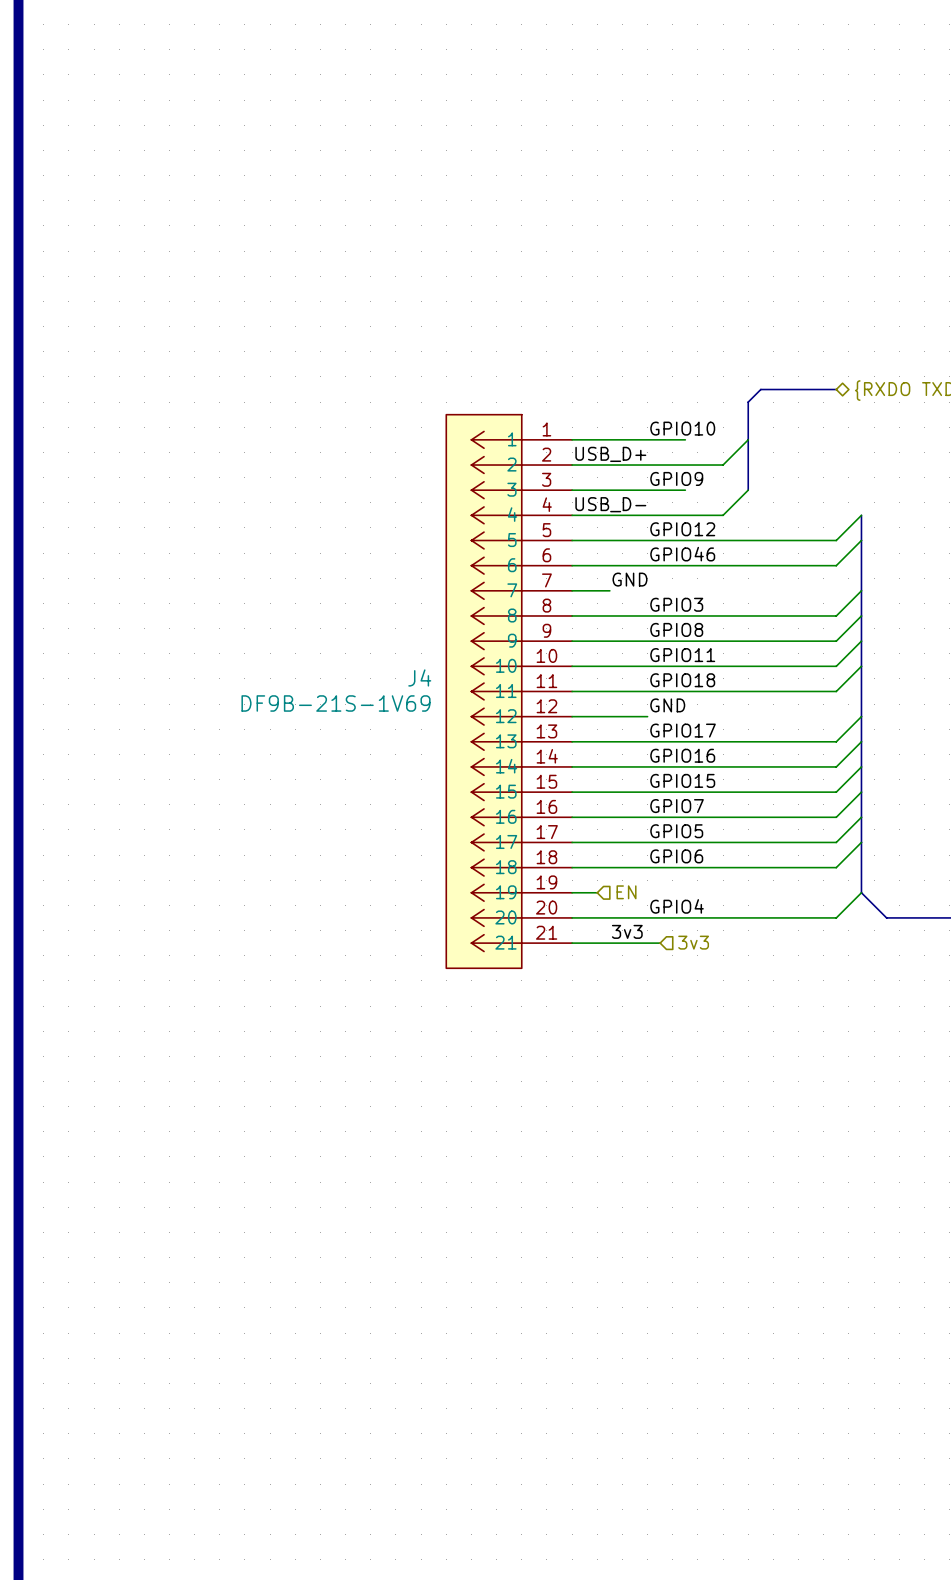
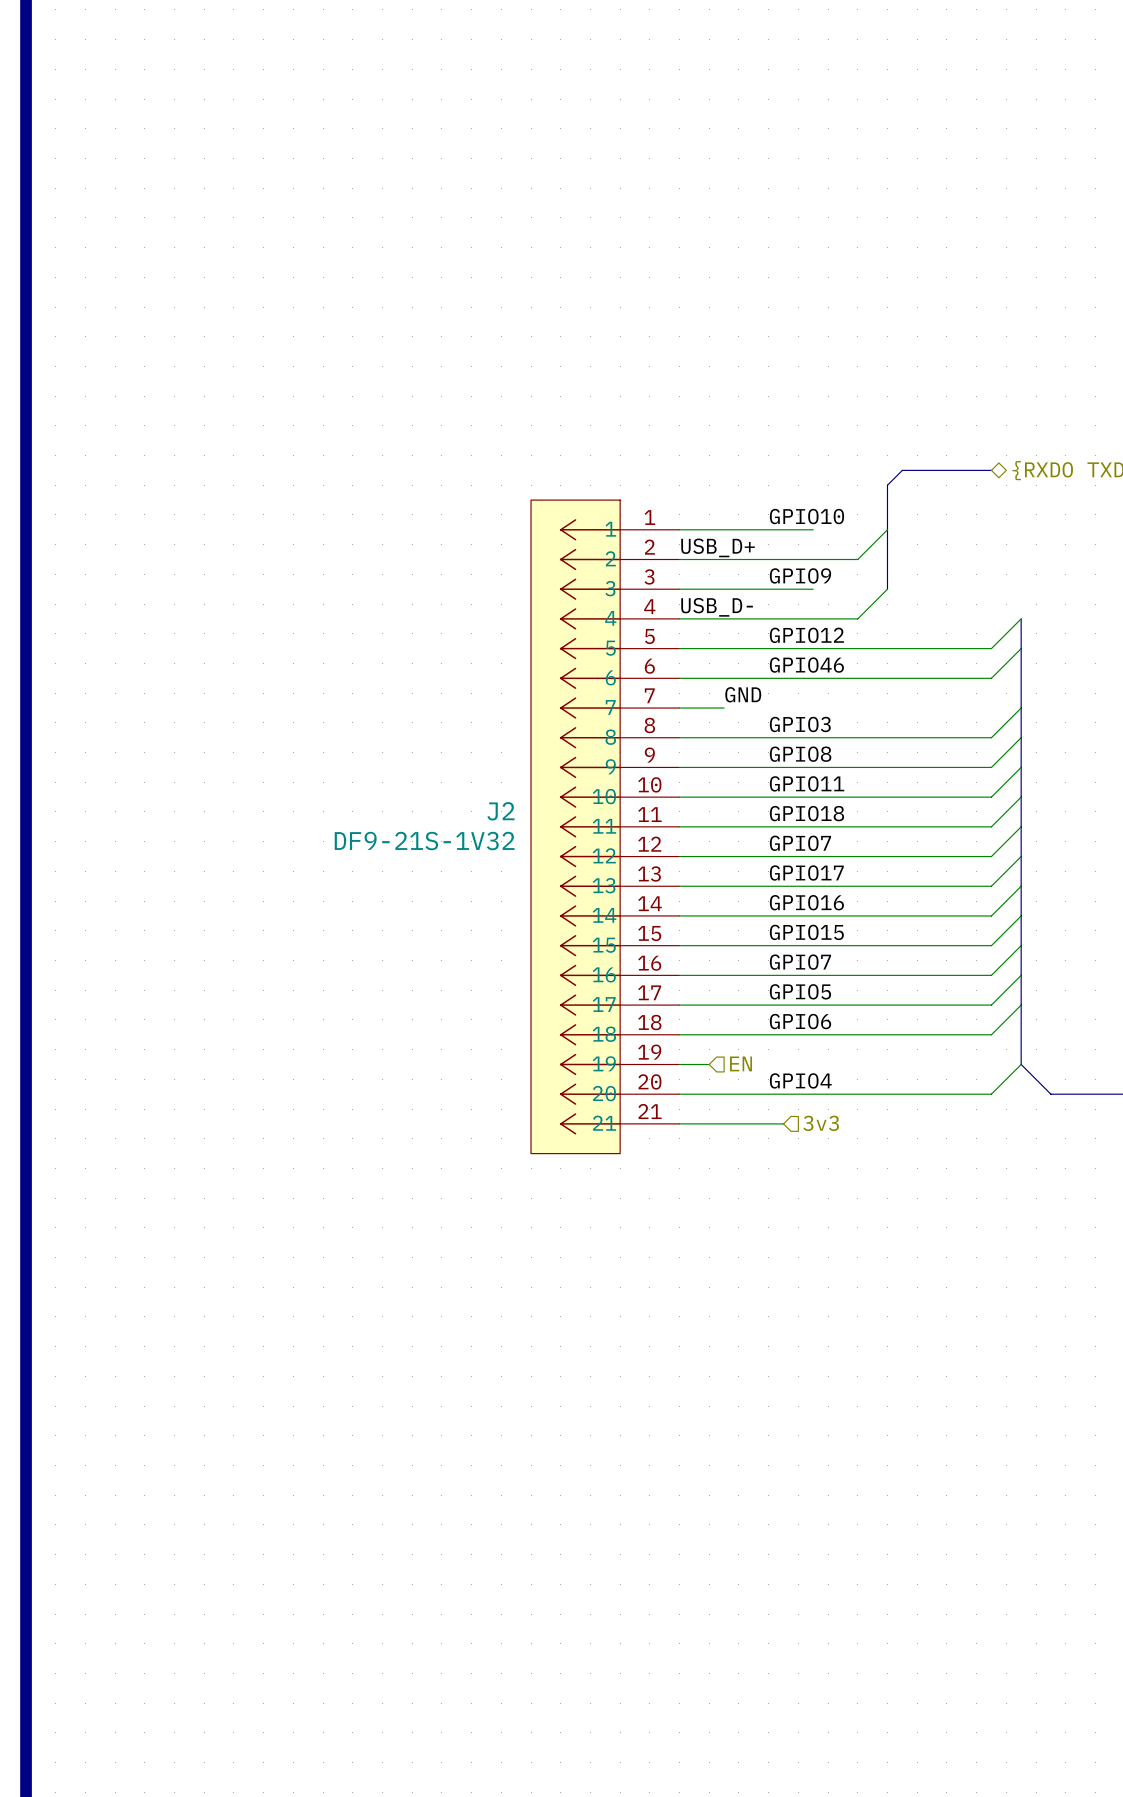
J4 name: J4 (419, 677) -> J2 (500, 811)
wire: none -> (1021, 826) (991, 856) (768, 856)
J4 value: DF9B-21S-1V69 (336, 703) -> DF9-21S-1V32 (424, 841)
label: GND (667, 705) -> GPIO7 (800, 843)
label: 3v3 (627, 931) -> none

